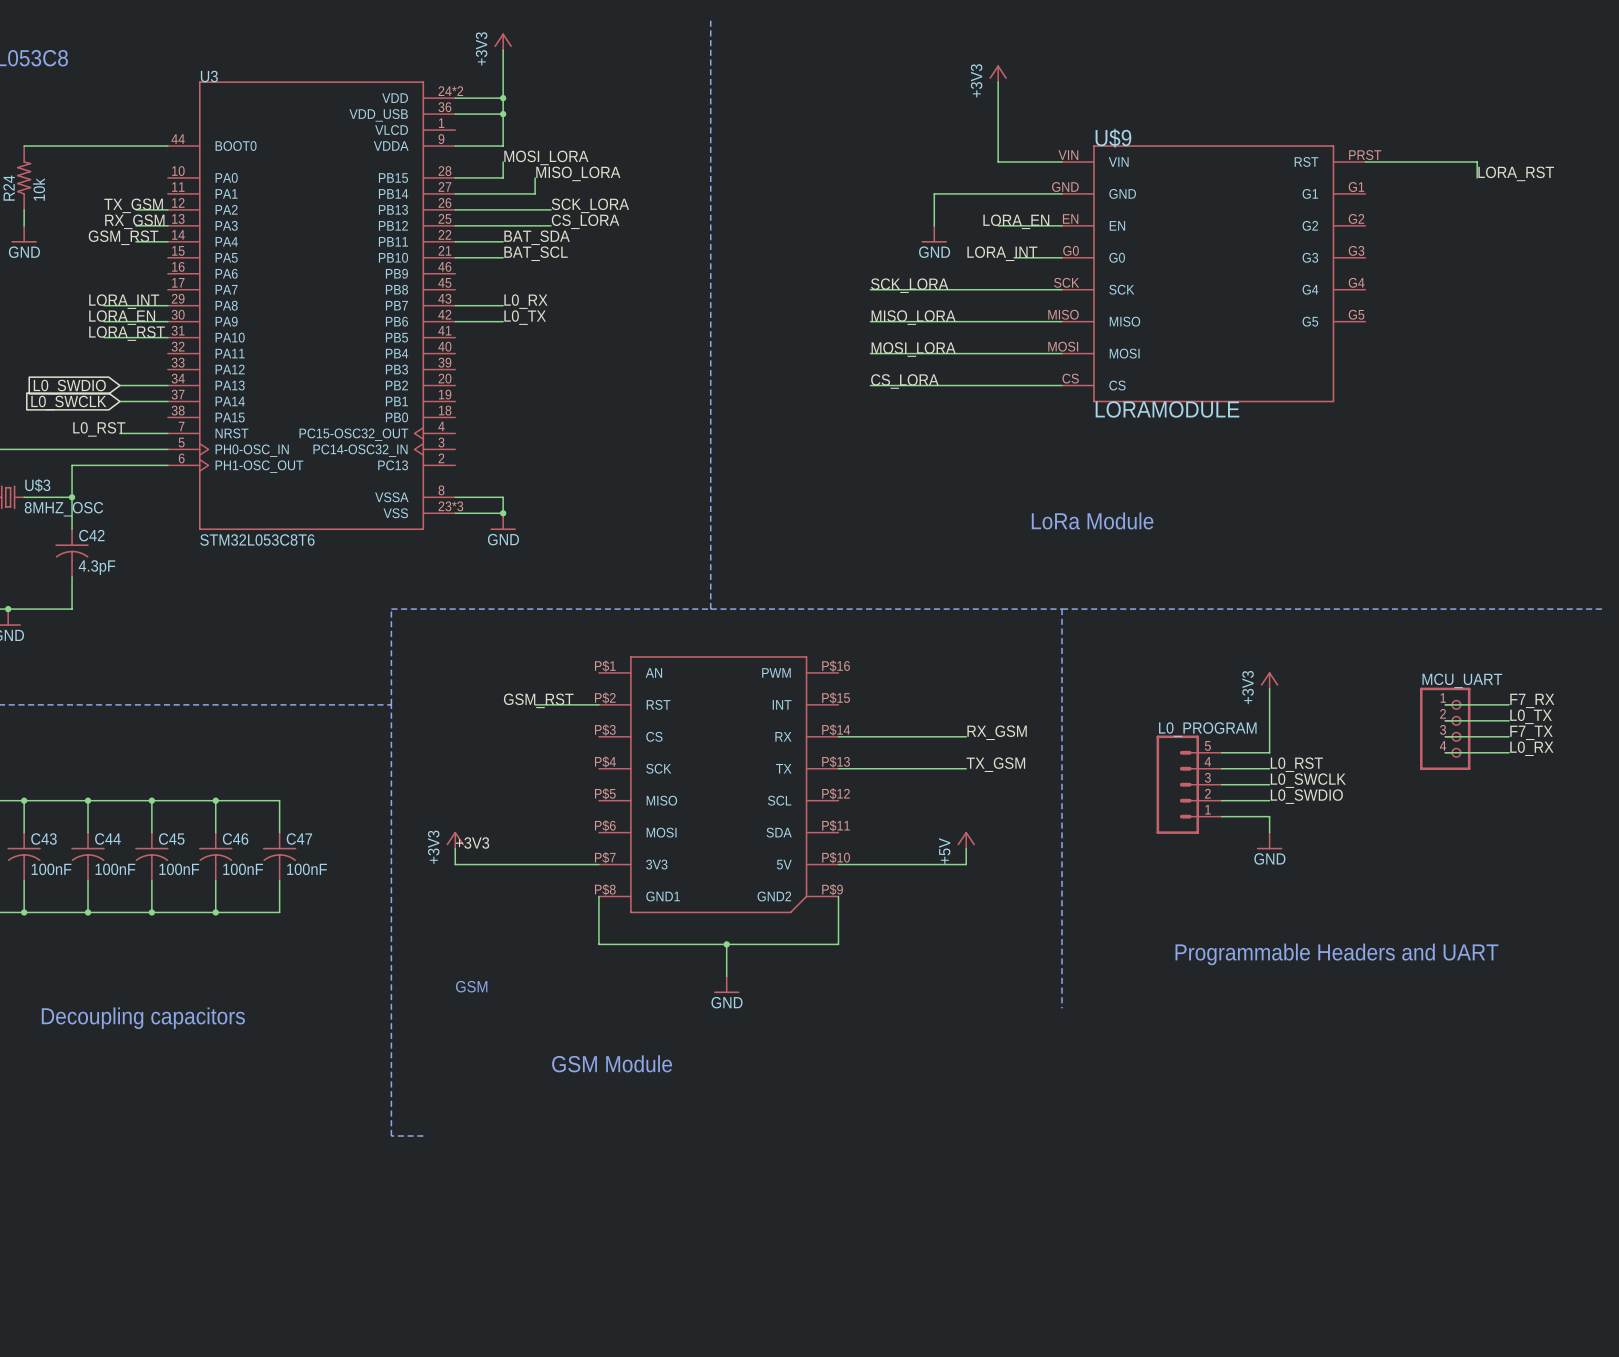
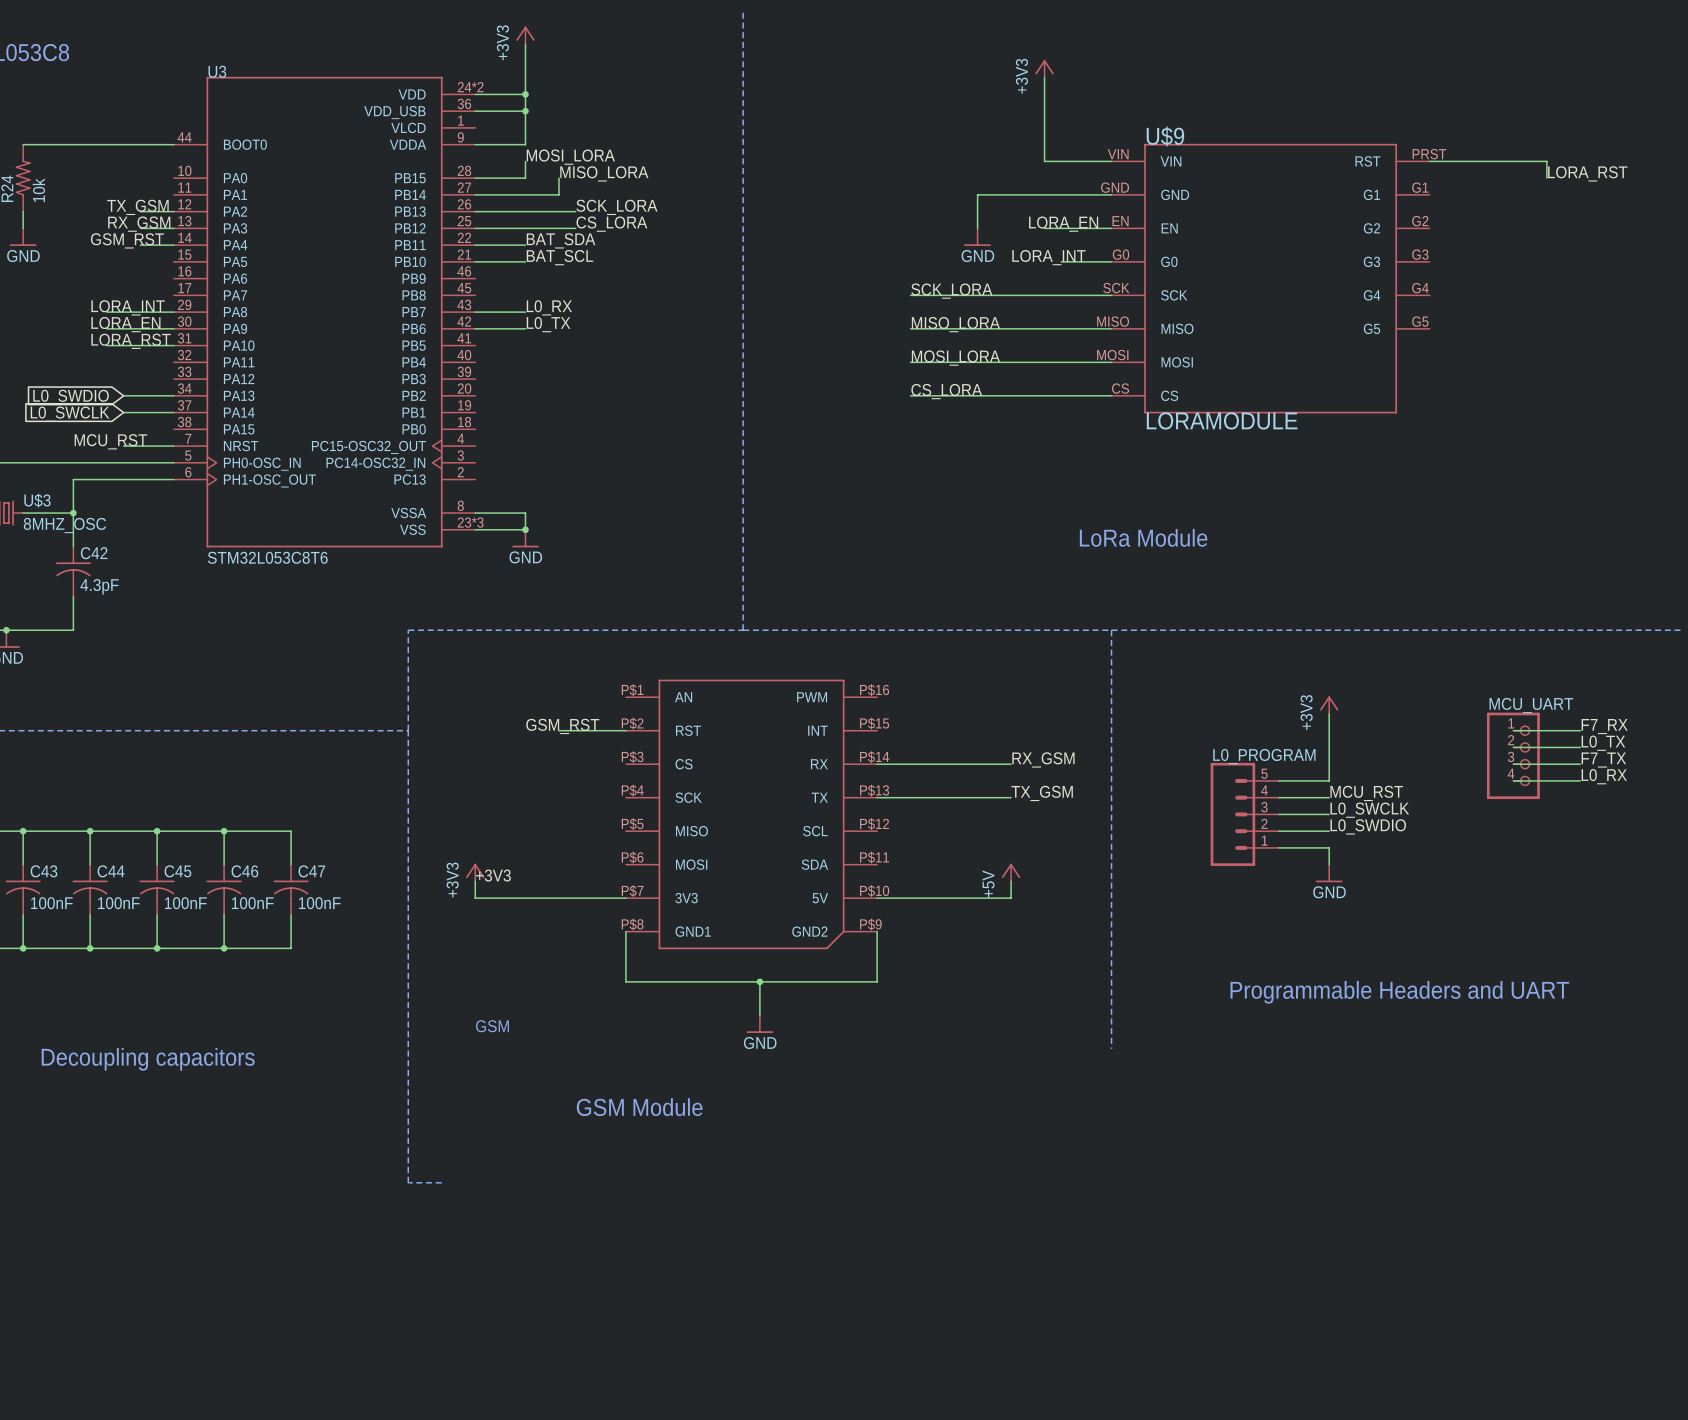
label: L0_RST (99, 429) -> MCU_RST (110, 441)
label: L0_RST (1296, 764) -> MCU_RST (1366, 793)

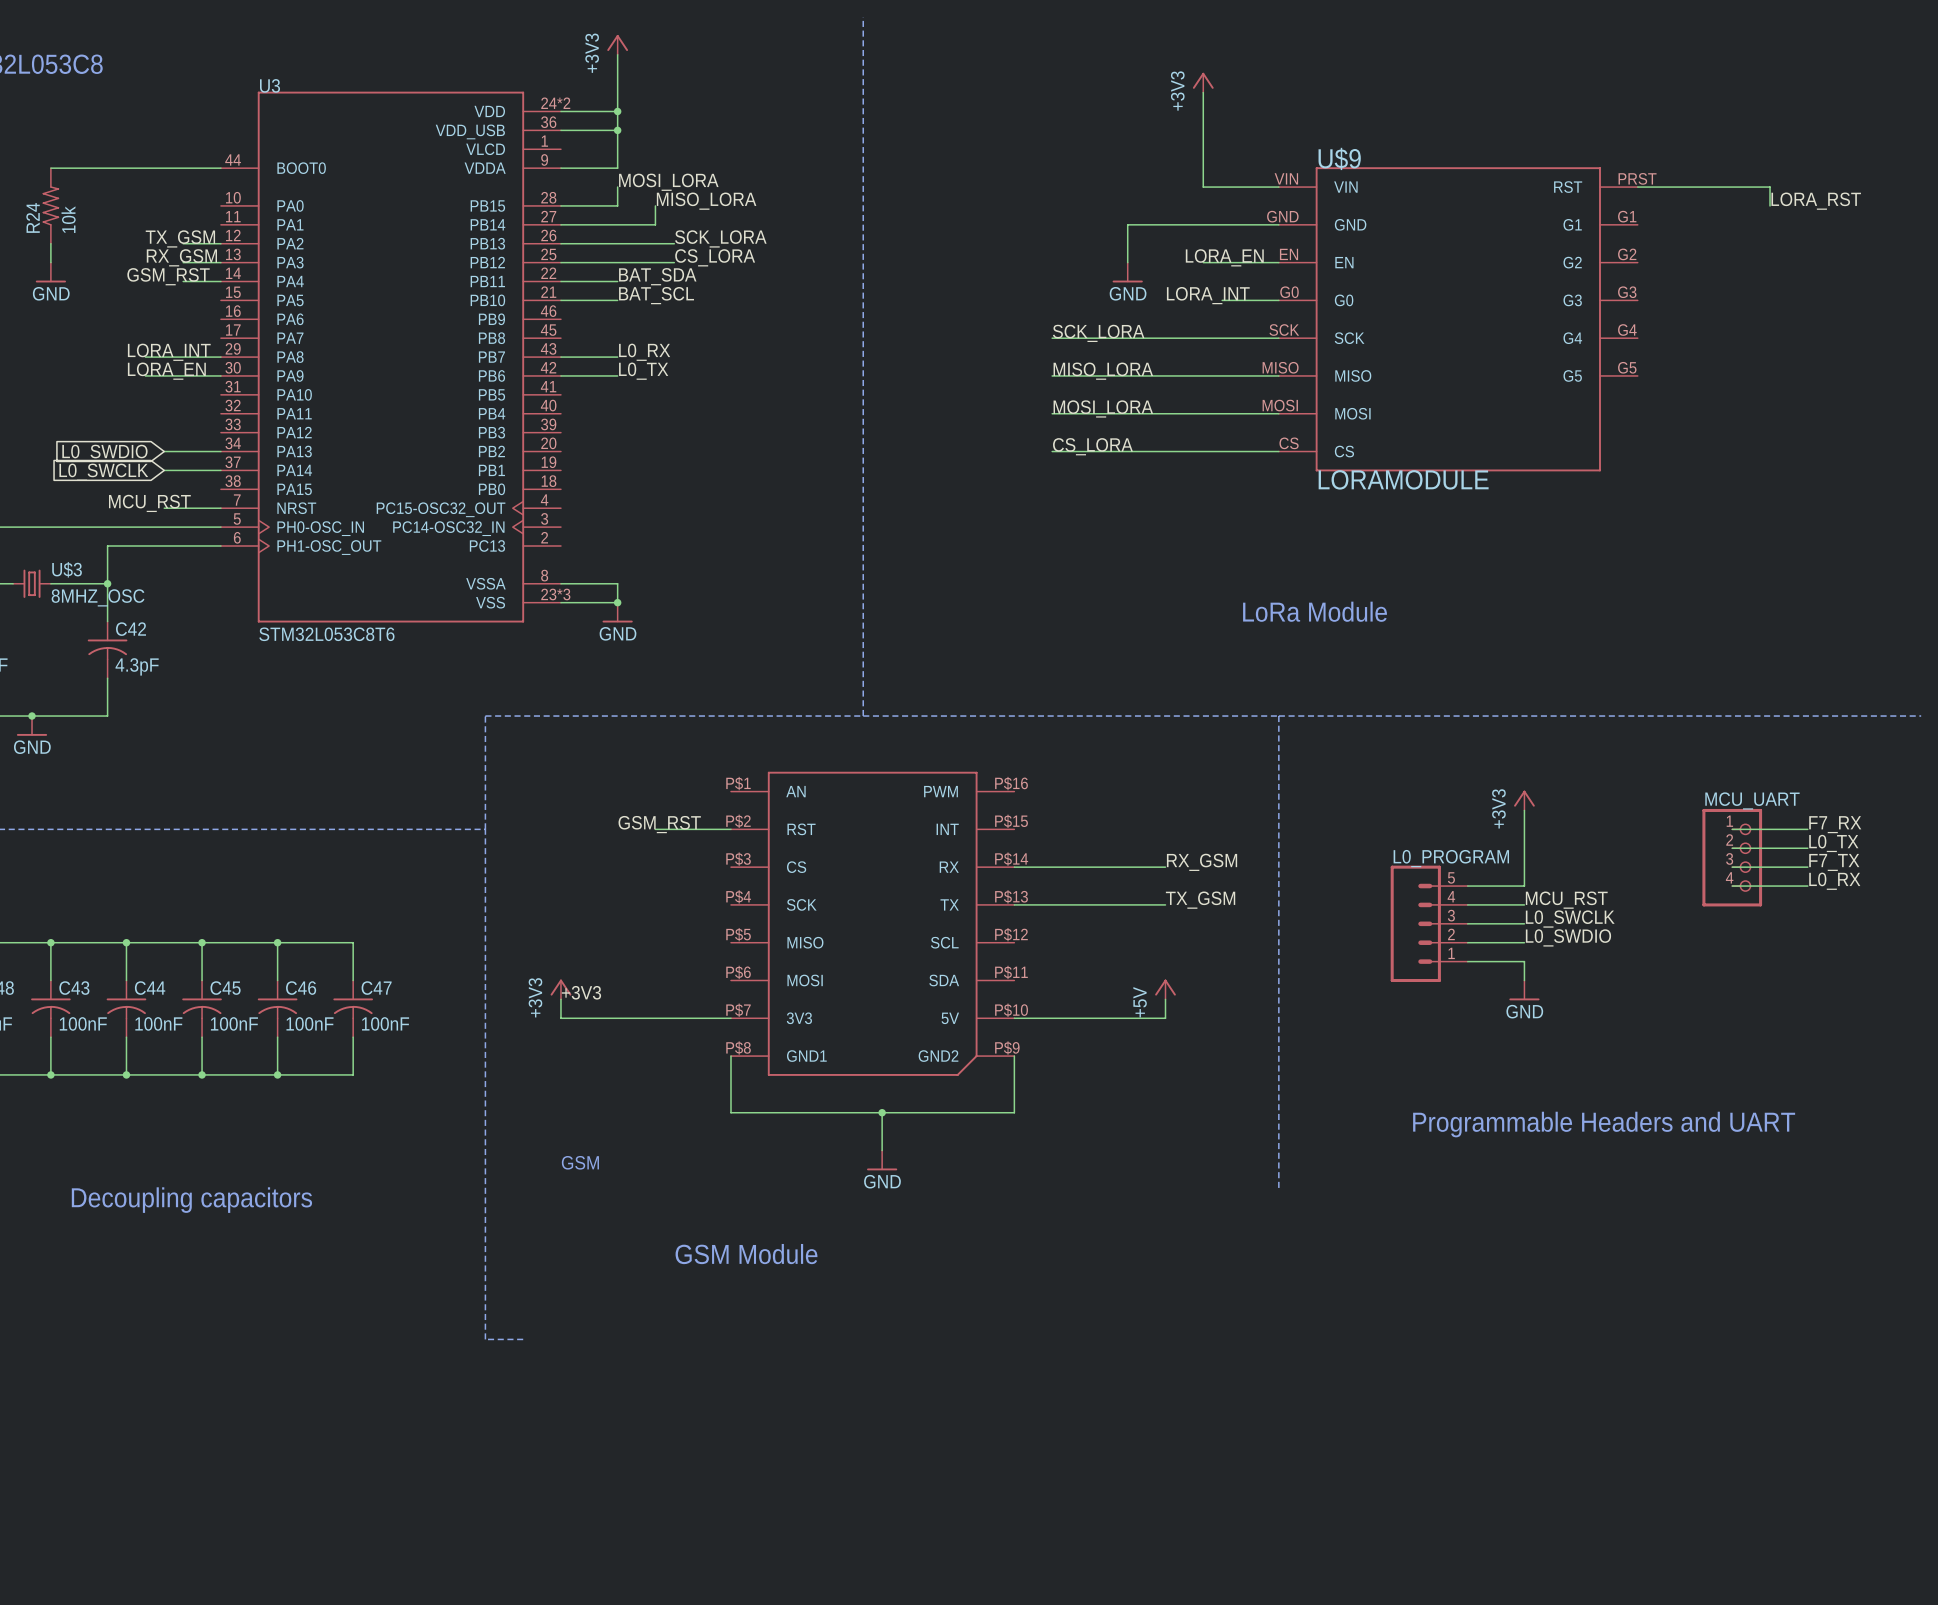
label: LORA_RST (131, 341) -> none
wire: (106, 345) (173, 345) -> none

